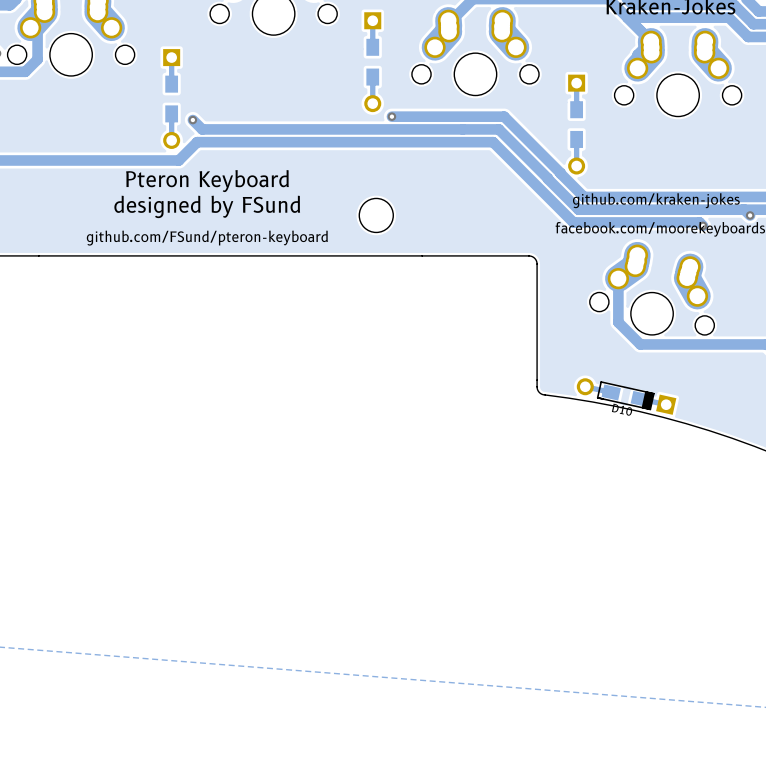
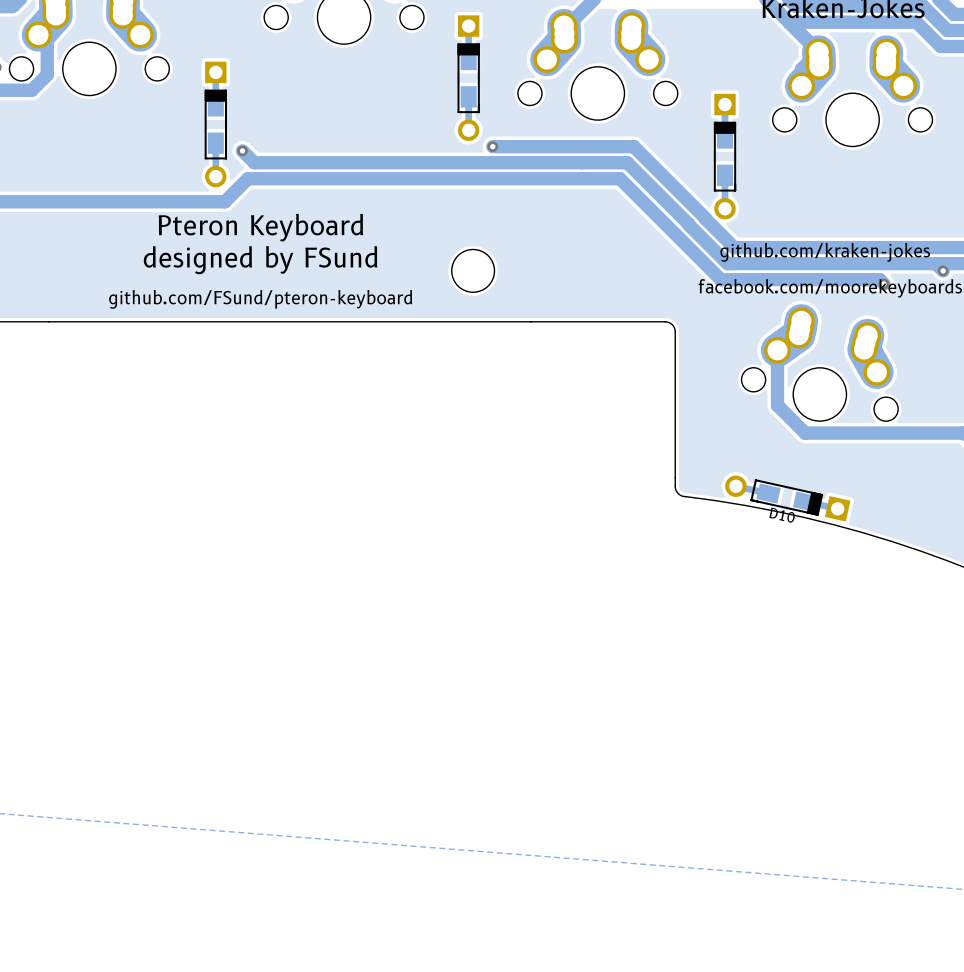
part footprint: [364, 12, 382, 113] -> [457, 15, 480, 141]
part footprint: [163, 49, 181, 149] -> [204, 61, 228, 188]
part footprint: [568, 74, 586, 175] -> [713, 93, 737, 220]

